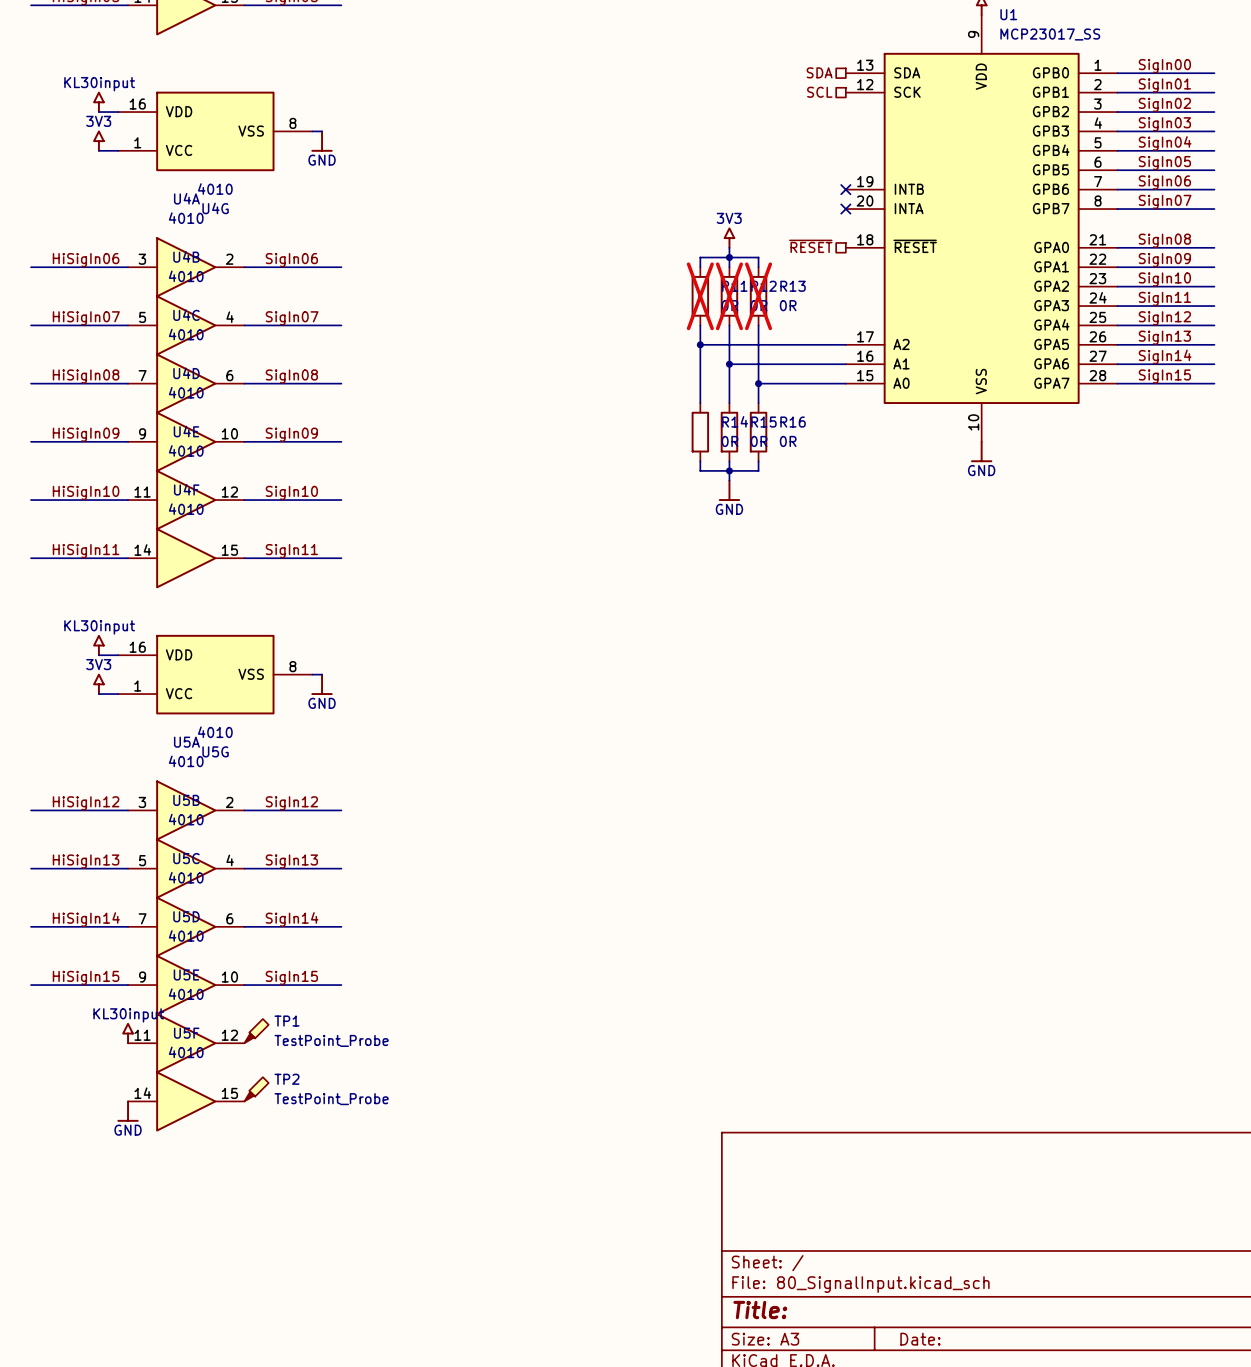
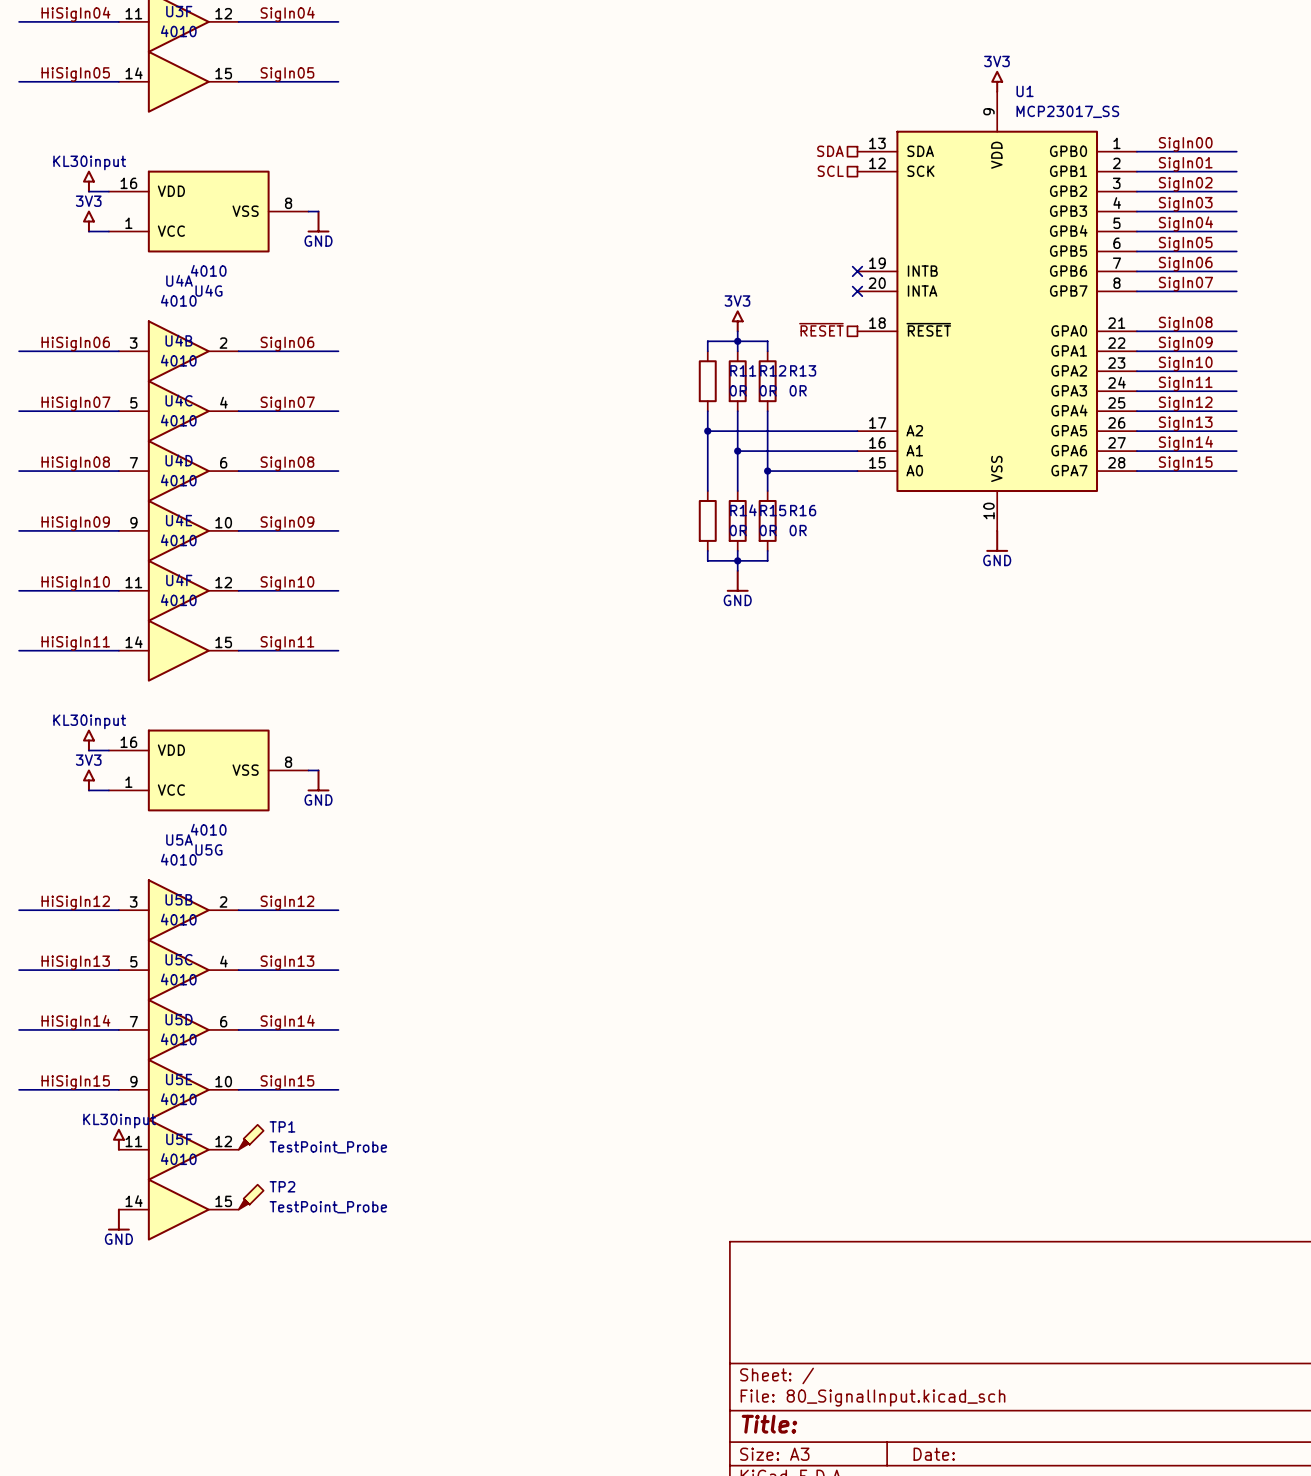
R11 do-not-place cross: (700, 296) -> none
R12 do-not-place cross: (729, 296) -> none
R13 do-not-place cross: (758, 296) -> none

